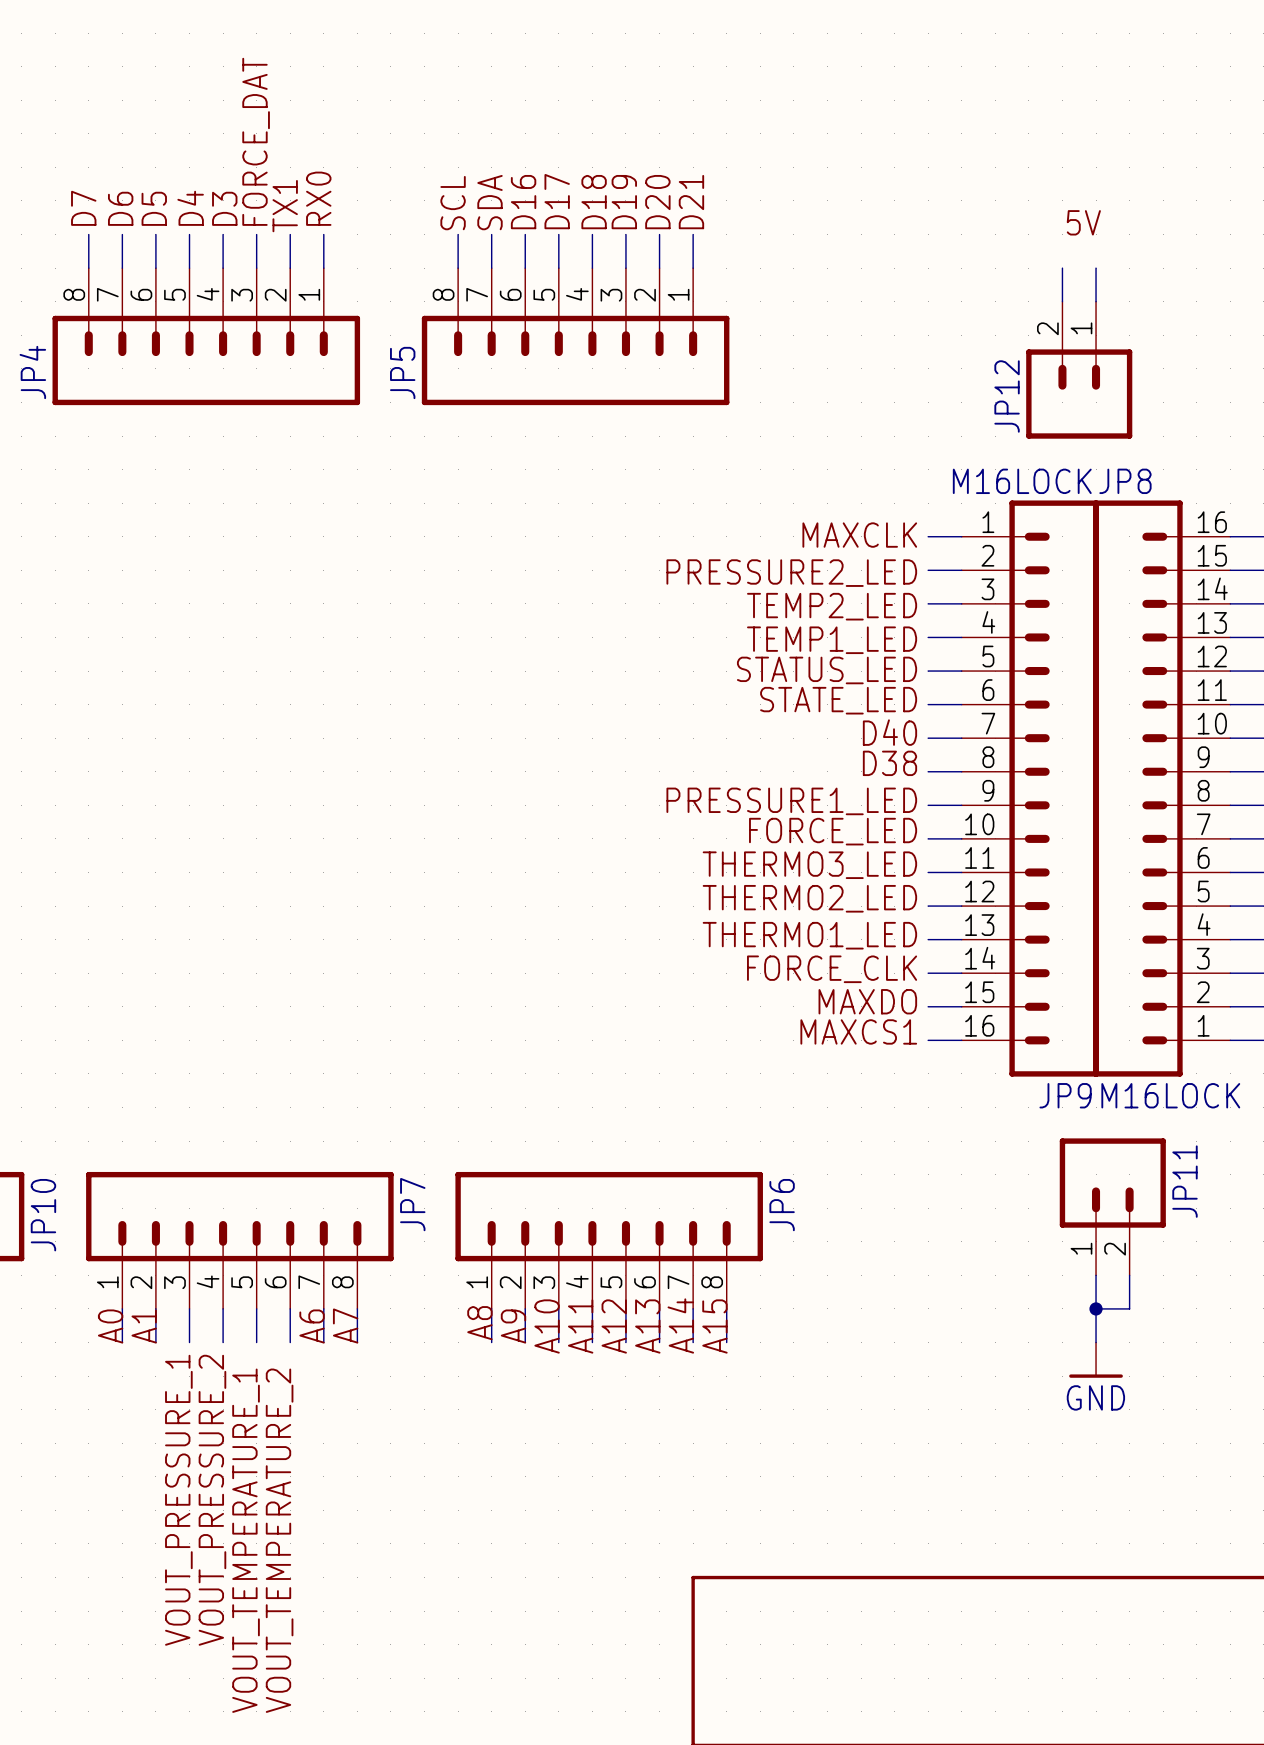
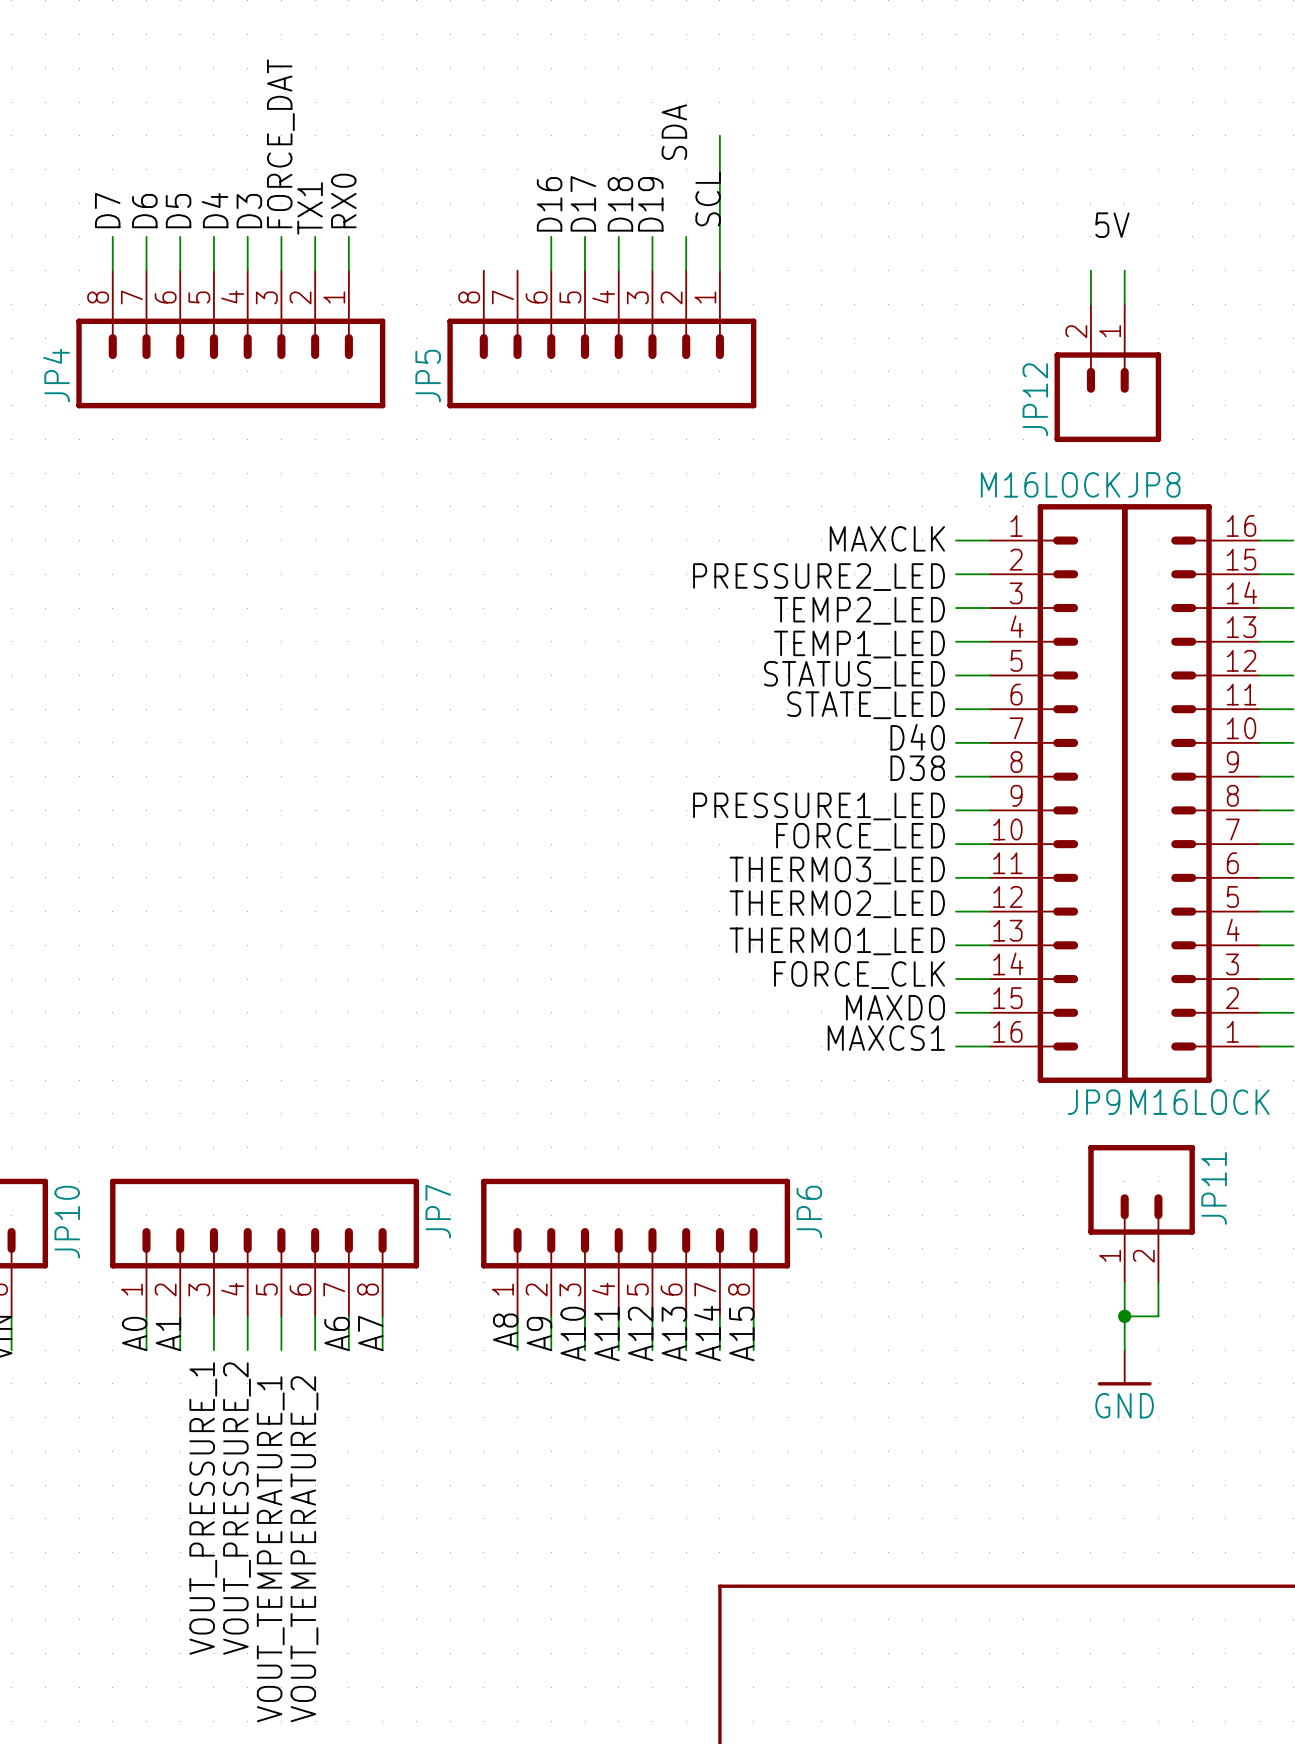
wire: none -> (719, 135) (719, 236)
label position: SDA (490, 202) -> SDA (674, 132)
label: D20 (657, 202) -> none
label: D21 (691, 202) -> none
label position: SCL (453, 203) -> SCL (708, 199)
wire: (458, 234) (458, 268) -> none
wire: (491, 234) (491, 268) -> none

